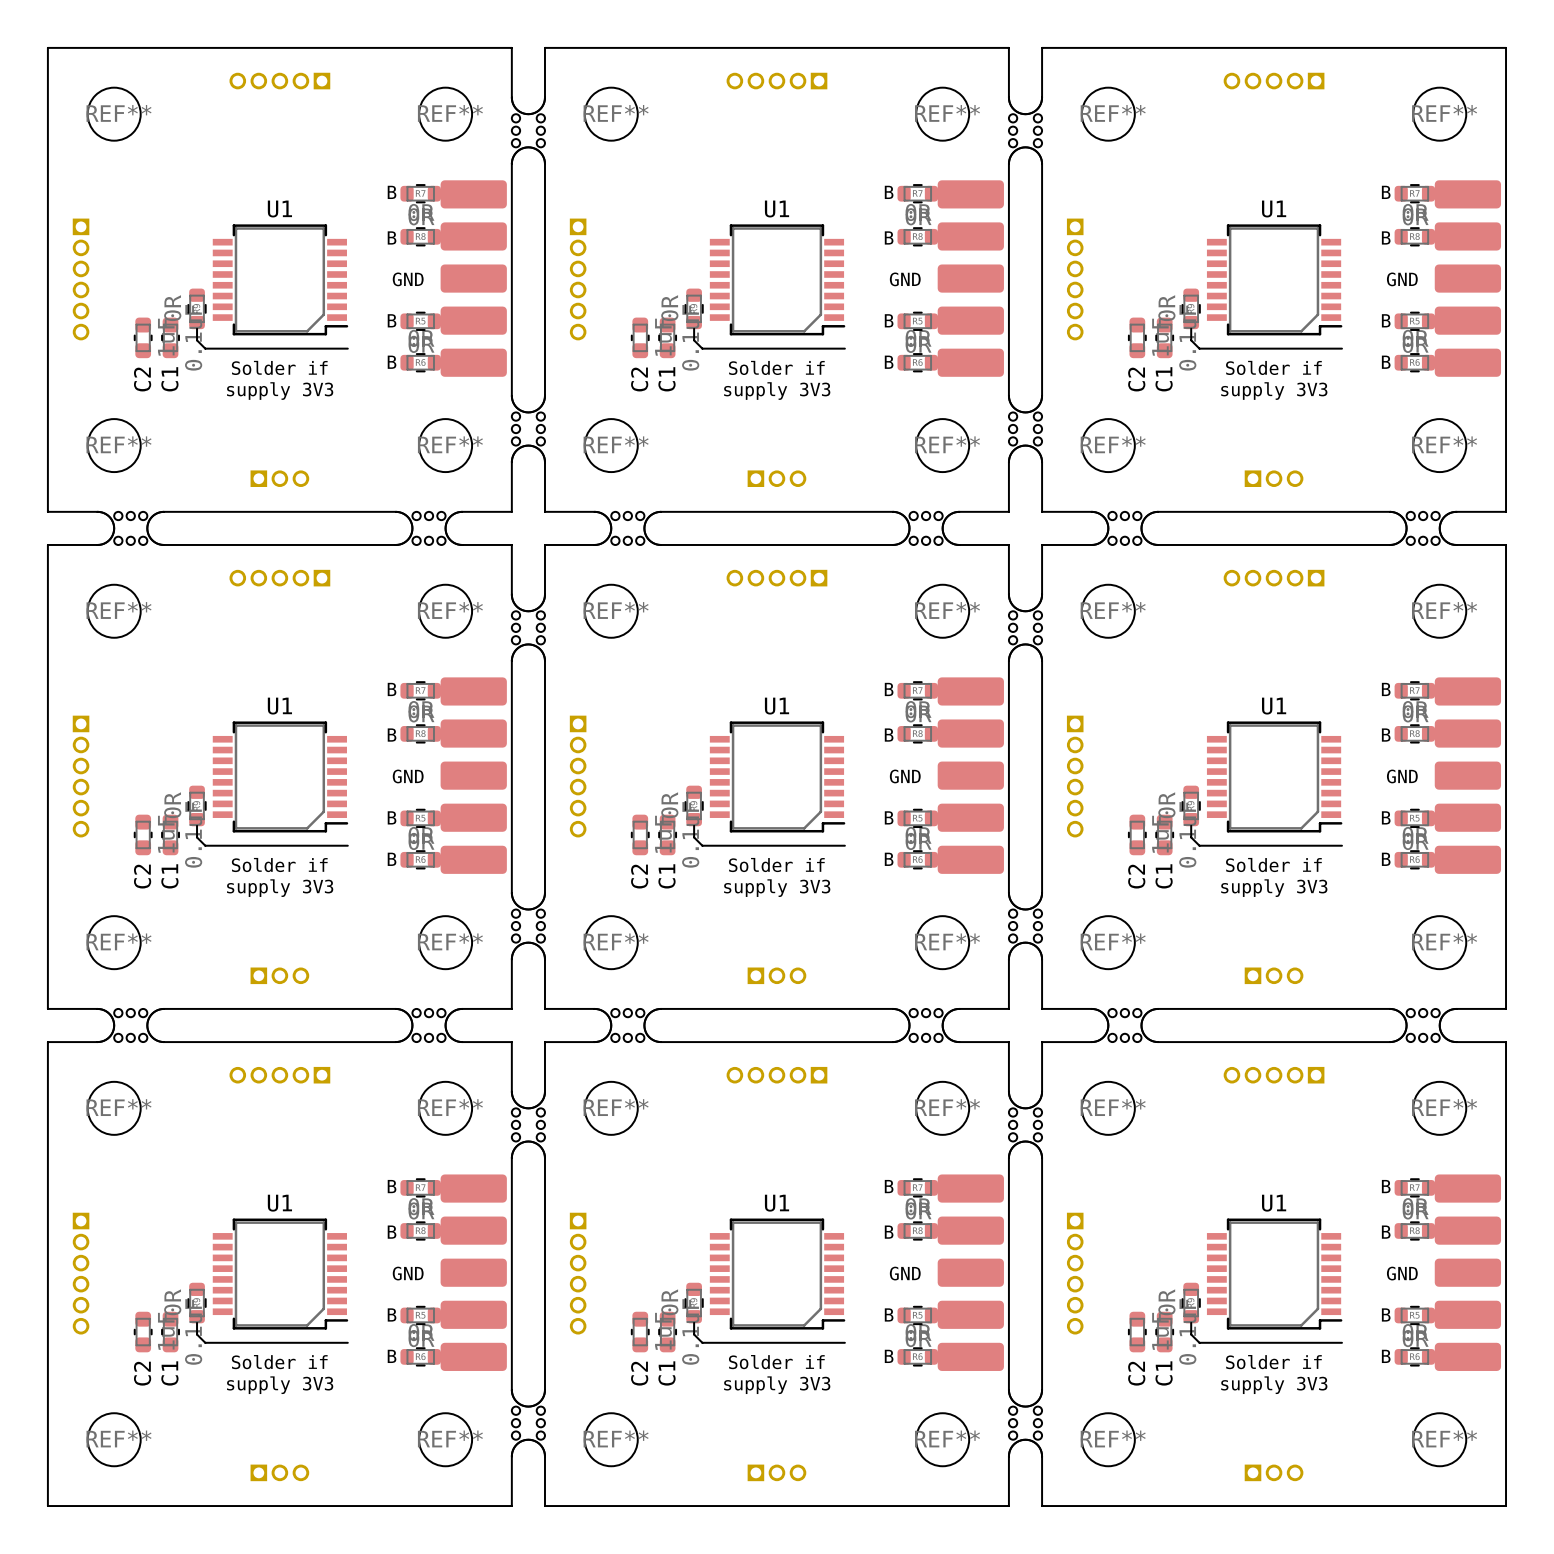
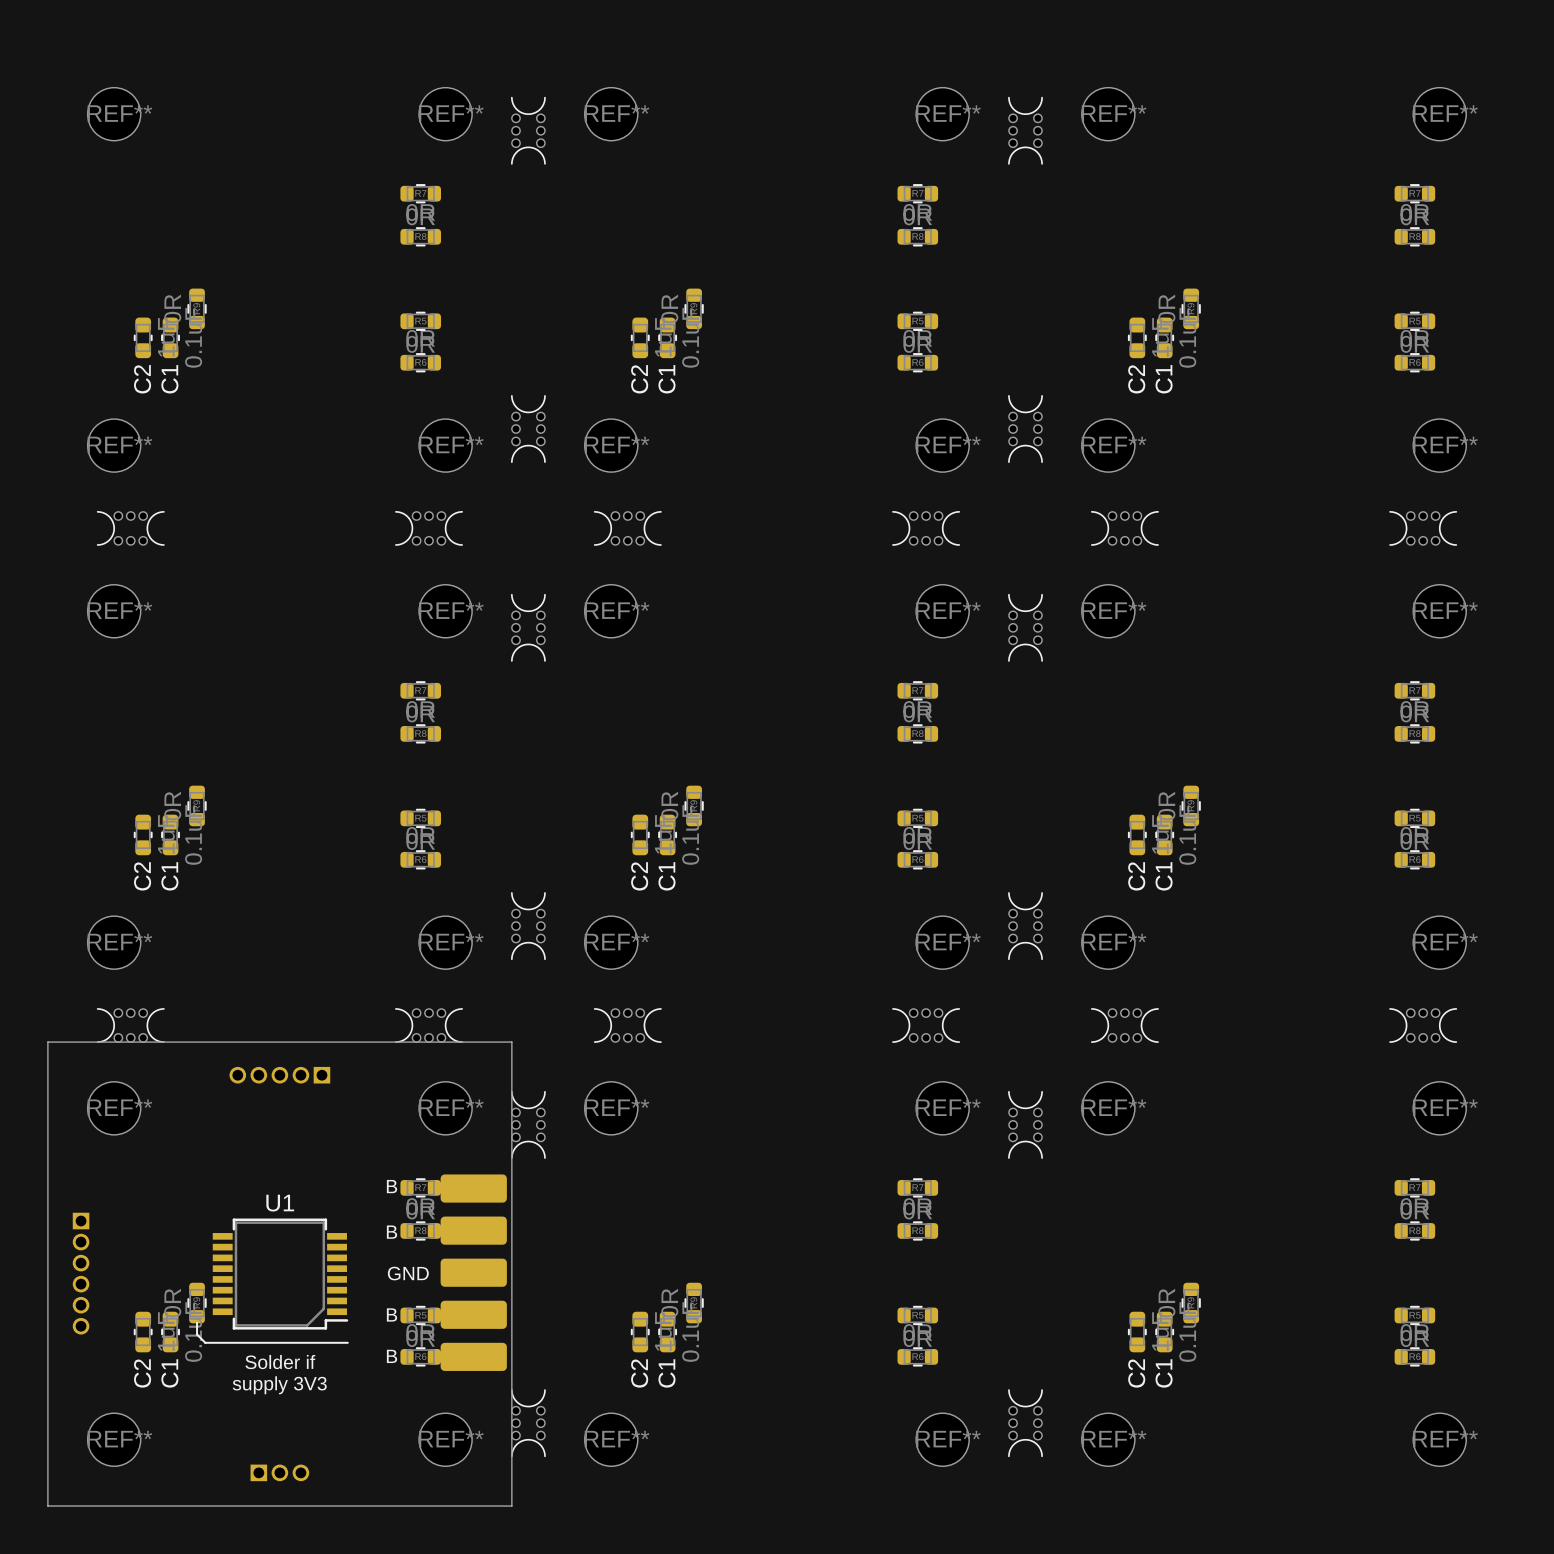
part: (279, 81) -> none
part: (776, 81) -> none
part: (1274, 81) -> none
board edge: (511, 163) (511, 398) (518, 409) (530, 412) (541, 405) (544, 395) (544, 161) (538, 150) (528, 147) (516, 152) (511, 163) -> none
board edge: (1008, 163) (1009, 398) (1015, 409) (1027, 412) (1038, 405) (1042, 395) (1041, 161) (1035, 150) (1025, 147) (1013, 152) (1008, 163) -> none
text: B (392, 192) -> none
text: B (889, 192) -> none
text: B (1386, 192) -> none
text: B (392, 237) -> none
text: B (889, 237) -> none
text: B (1386, 237) -> none
part: (473, 278) -> none
part: (970, 278) -> none
part: (1467, 278) -> none
part: (81, 279) -> none
U1: (280, 279) -> none
text: GND (408, 279) -> none
part: (578, 279) -> none
U1: (777, 279) -> none
text: GND (905, 279) -> none
part: (1075, 279) -> none
U1: (1274, 279) -> none
text: GND (1402, 279) -> none
text: B (392, 320) -> none
text: B (889, 320) -> none
text: B (1386, 320) -> none
line: (197, 328) (197, 340) (205, 348) (347, 348) -> none
line: (694, 328) (694, 340) (702, 348) (844, 348) -> none
line: (1191, 328) (1191, 340) (1199, 348) (1341, 348) -> none
text: B (392, 362) -> none
text: B (889, 362) -> none
text: B (1386, 362) -> none
text: Solder if (279, 367) -> none
text: Solder if (776, 367) -> none
text: Solder if (1273, 367) -> none
text: supply 3V3 (280, 391) -> none
text: supply 3V3 (777, 391) -> none
text: supply 3V3 (1274, 391) -> none
board edge: (511, 462) (511, 511) (457, 512) (449, 518) (445, 530) (449, 538) (457, 544) (511, 544) (512, 598) (518, 607) (530, 611) (538, 607) (544, 598) (544, 544) (598, 544) (607, 538) (611, 526) (607, 518) (598, 512) (544, 511) (544, 459) (541, 452) (536, 447) (528, 445) (520, 447) (514, 453) (511, 462) -> none
board edge: (1008, 462) (1008, 511) (954, 512) (946, 518) (942, 530) (946, 538) (954, 544) (1008, 544) (1009, 598) (1015, 607) (1027, 611) (1035, 607) (1041, 598) (1042, 544) (1096, 544) (1104, 538) (1108, 526) (1104, 518) (1096, 512) (1042, 511) (1041, 459) (1038, 452) (1033, 447) (1025, 445) (1017, 447) (1011, 453) (1008, 462) -> none
part: (279, 478) -> none
part: (776, 478) -> none
part: (1274, 478) -> none
board edge: (163, 511) (398, 511) (409, 518) (412, 530) (405, 541) (395, 544) (161, 544) (150, 538) (147, 528) (152, 516) (163, 511) -> none
board edge: (660, 511) (895, 511) (906, 518) (909, 530) (903, 541) (892, 544) (658, 544) (647, 538) (644, 528) (649, 516) (660, 511) -> none
board edge: (1158, 511) (1392, 511) (1403, 518) (1406, 530) (1400, 541) (1390, 544) (1155, 544) (1144, 538) (1141, 528) (1146, 516) (1158, 511) -> none
part: (279, 578) -> none
part: (776, 578) -> none
part: (1274, 578) -> none
board edge: (511, 660) (511, 895) (518, 906) (530, 909) (541, 903) (544, 892) (544, 658) (538, 647) (528, 644) (516, 649) (511, 660) -> none
board edge: (1008, 660) (1009, 895) (1015, 906) (1027, 909) (1038, 903) (1042, 892) (1041, 658) (1035, 647) (1025, 644) (1013, 649) (1008, 660) -> none
text: B (392, 689) -> none
text: B (889, 689) -> none
text: B (1386, 689) -> none
text: B (392, 735) -> none
text: B (889, 735) -> none
text: B (1386, 735) -> none
part: (473, 775) -> none
part: (970, 775) -> none
part: (1467, 775) -> none
part: (81, 776) -> none
U1: (280, 776) -> none
text: GND (408, 776) -> none
part: (578, 776) -> none
U1: (777, 776) -> none
text: GND (905, 776) -> none
part: (1075, 776) -> none
U1: (1274, 776) -> none
text: GND (1402, 776) -> none
text: B (392, 817) -> none
text: B (889, 817) -> none
text: B (1386, 817) -> none
line: (197, 825) (197, 837) (205, 845) (347, 845) -> none
line: (694, 825) (694, 837) (702, 845) (844, 845) -> none
line: (1191, 825) (1191, 837) (1199, 845) (1341, 845) -> none
text: B (392, 859) -> none
text: B (889, 859) -> none
text: B (1386, 859) -> none
text: Solder if (279, 865) -> none
text: Solder if (776, 865) -> none
text: Solder if (1273, 865) -> none
text: supply 3V3 (280, 888) -> none
text: supply 3V3 (777, 888) -> none
text: supply 3V3 (1274, 888) -> none
board edge: (1008, 959) (1008, 1008) (954, 1009) (946, 1015) (942, 1027) (946, 1035) (954, 1041) (1008, 1042) (1009, 1096) (1015, 1104) (1027, 1108) (1035, 1104) (1041, 1096) (1042, 1042) (1096, 1041) (1104, 1035) (1108, 1023) (1104, 1015) (1096, 1009) (1042, 1008) (1041, 957) (1038, 949) (1033, 944) (1025, 942) (1017, 944) (1011, 950) (1008, 959) -> none
part: (279, 975) -> none
part: (776, 975) -> none
part: (1274, 975) -> none
board edge: (660, 1008) (895, 1009) (906, 1015) (909, 1027) (903, 1038) (892, 1042) (658, 1041) (647, 1035) (644, 1025) (649, 1013) (660, 1008) -> none
board edge: (1158, 1008) (1392, 1009) (1403, 1015) (1406, 1027) (1400, 1038) (1390, 1042) (1155, 1041) (1144, 1035) (1141, 1025) (1146, 1013) (1158, 1008) -> none
board edge: (97, 1042) (107, 1038) (113, 1029) (112, 1019) (105, 1011) (97, 1008) (47, 1008) (47, 544) (101, 544) (110, 538) (114, 528) (110, 518) (101, 512) (47, 511) (47, 47) (511, 47) (512, 101) (518, 110) (528, 114) (538, 110) (544, 101) (544, 47) (1008, 47) (1009, 101) (1015, 110) (1025, 114) (1035, 110) (1041, 101) (1042, 47) (1506, 47) (1506, 511) (1452, 512) (1443, 518) (1439, 528) (1443, 538) (1452, 544) (1506, 544) (1506, 1008) (1452, 1009) (1443, 1015) (1439, 1025) (1443, 1035) (1452, 1041) (1506, 1042) (1506, 1506) (1042, 1506) (1041, 1452) (1035, 1443) (1025, 1439) (1015, 1443) (1009, 1452) (1008, 1506) (544, 1506) (544, 1456) (542, 1448) (534, 1441) (524, 1440) (515, 1446) (511, 1456) -> (511, 1390) (511, 1456)
board edge: (163, 1042) (152, 1037) (147, 1025) (152, 1013) (163, 1008) (398, 1009) (409, 1015) (412, 1025) (407, 1037) (395, 1042) -> (163, 1042) (97, 1042)
board edge: (462, 1042) (452, 1038) (446, 1031) (445, 1023) (449, 1015) (459, 1009) (511, 1008) (513, 952) (518, 946) (524, 943) (532, 943) (538, 946) (544, 957) (544, 1008) (598, 1009) (607, 1015) (611, 1027) (607, 1035) (598, 1041) (544, 1042) (544, 1093) (541, 1101) (536, 1106) (528, 1108) (520, 1106) (514, 1100) (511, 1091) -> (462, 1042) (395, 1042)
part: (776, 1075) -> none
part: (1274, 1075) -> none
board edge: (511, 1158) (516, 1146) (528, 1141) (540, 1146) (544, 1158) (544, 1392) (538, 1403) (528, 1406) (516, 1401) (511, 1390) -> (511, 1158) (511, 1091)
board edge: (1008, 1158) (1009, 1392) (1015, 1403) (1027, 1406) (1038, 1400) (1042, 1390) (1041, 1155) (1035, 1144) (1025, 1141) (1013, 1146) (1008, 1158) -> none
text: B (889, 1186) -> none
text: B (1386, 1186) -> none
text: B (889, 1232) -> none
text: B (1386, 1232) -> none
part: (970, 1272) -> none
part: (1467, 1272) -> none
part: (578, 1273) -> none
text: GND (905, 1273) -> none
part: (1075, 1273) -> none
text: GND (1402, 1273) -> none
U1: (777, 1274) -> none
U1: (1274, 1274) -> none
text: B (889, 1314) -> none
text: B (1386, 1314) -> none
line: (694, 1322) (694, 1334) (702, 1342) (844, 1342) -> none
line: (1191, 1322) (1191, 1334) (1199, 1342) (1341, 1342) -> none
text: B (889, 1356) -> none
text: B (1386, 1356) -> none
text: Solder if (776, 1362) -> none
text: Solder if (1273, 1362) -> none
text: supply 3V3 (777, 1385) -> none
text: supply 3V3 (1274, 1385) -> none
part: (776, 1472) -> none
part: (1274, 1472) -> none

